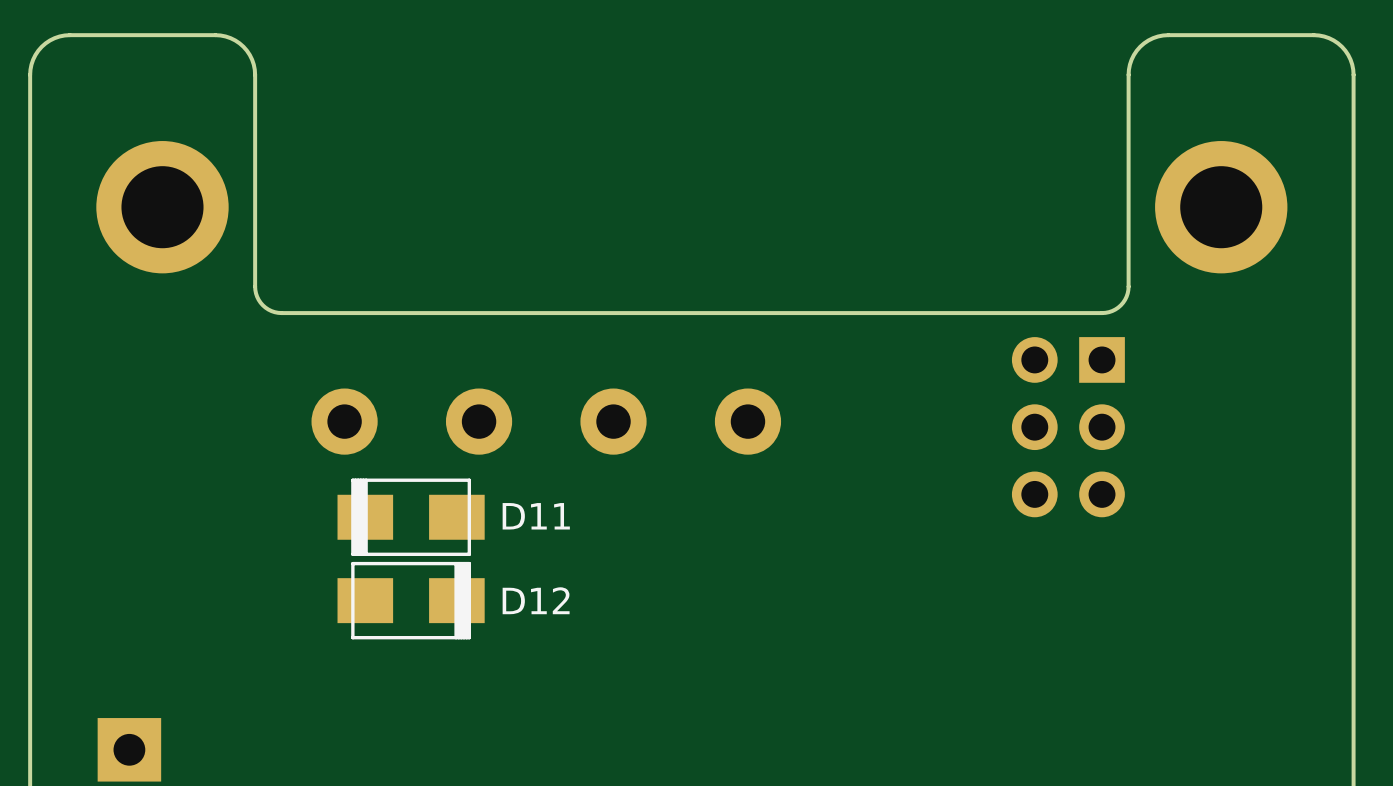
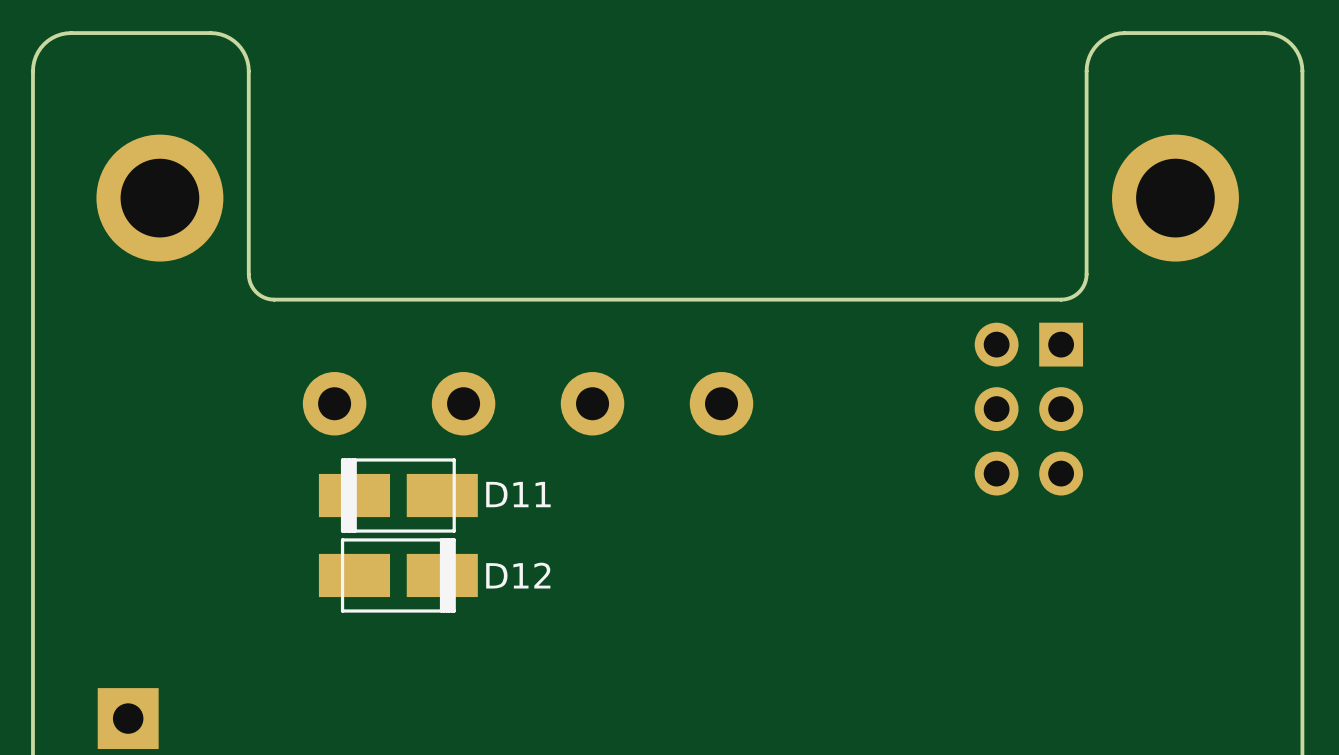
D11 footprint: [337, 478, 485, 556] -> [318, 458, 478, 533]
D12 footprint: [337, 561, 485, 640] -> [318, 538, 478, 613]

